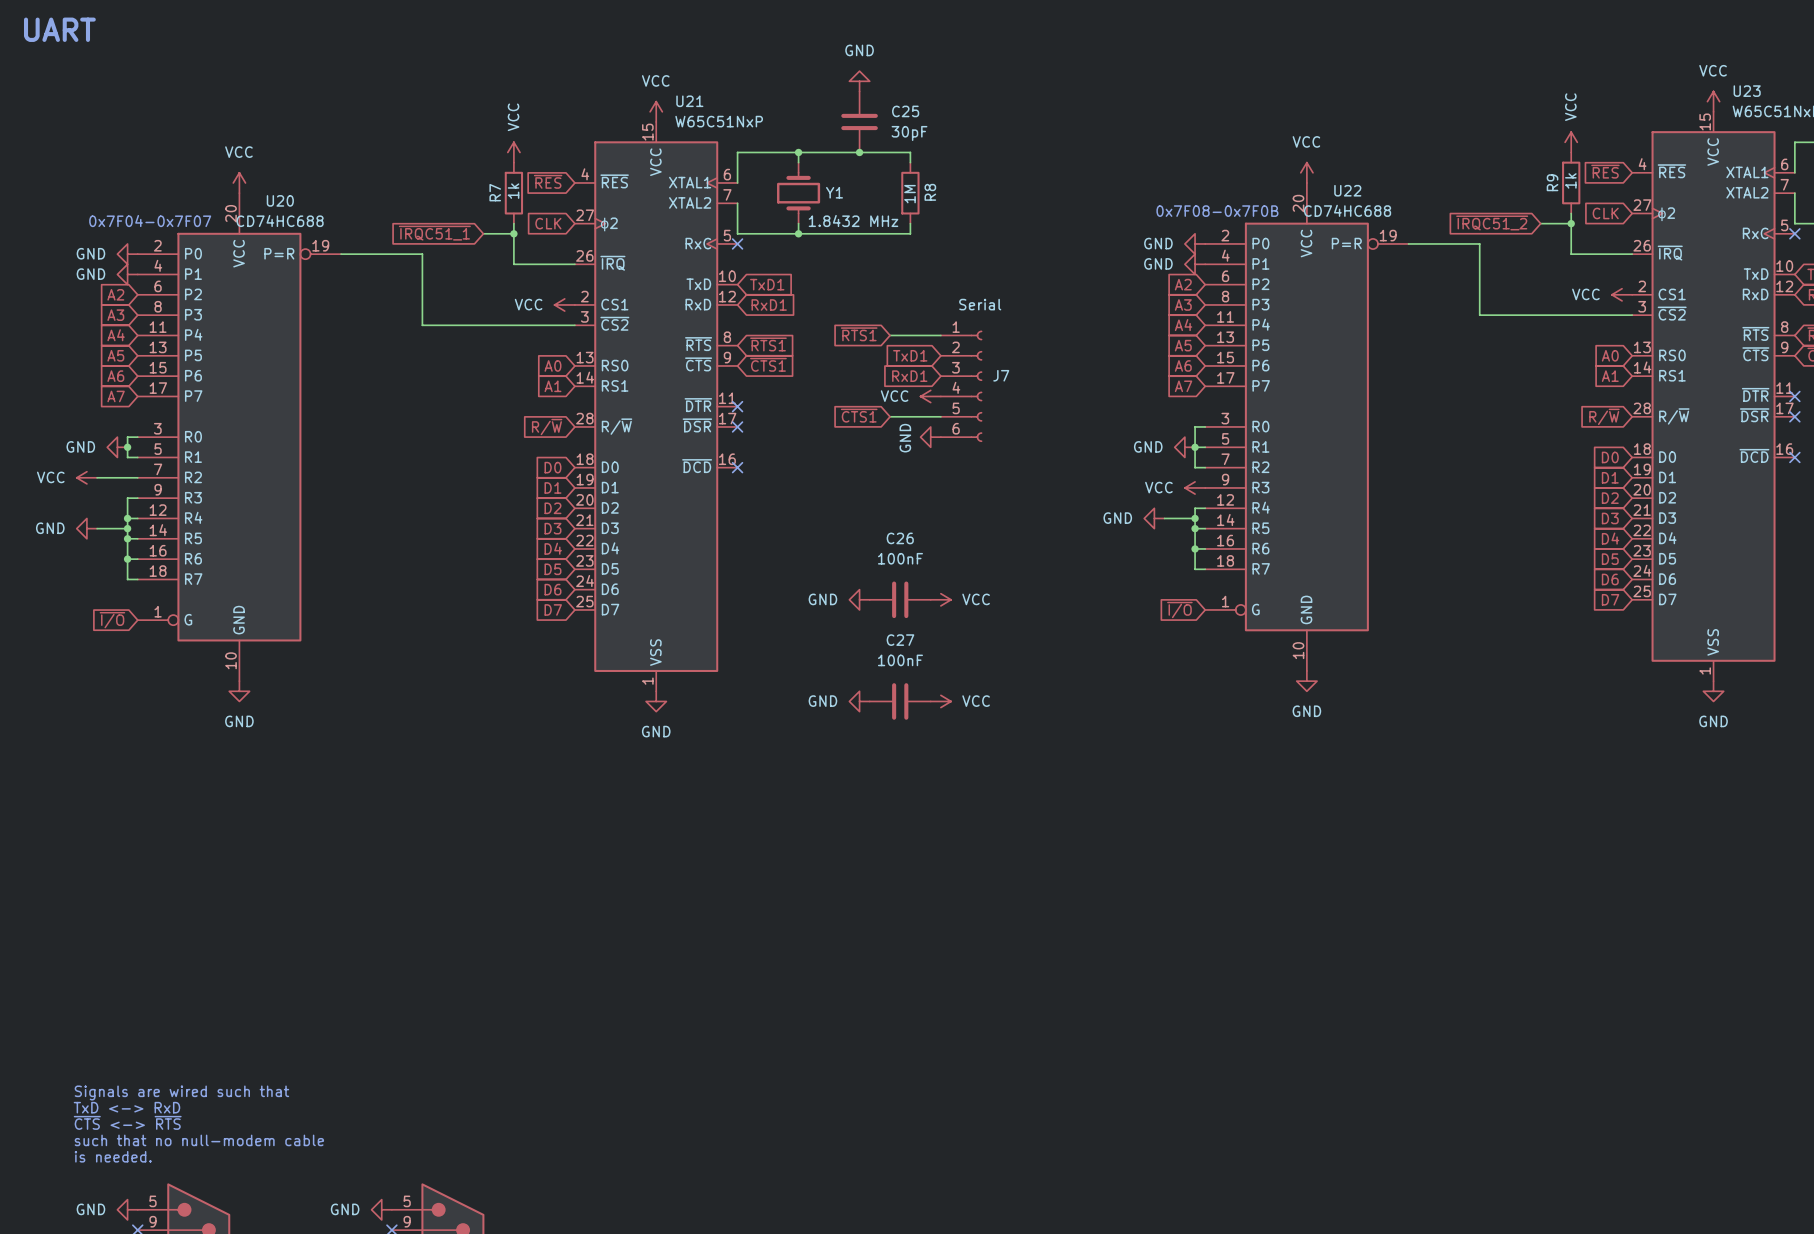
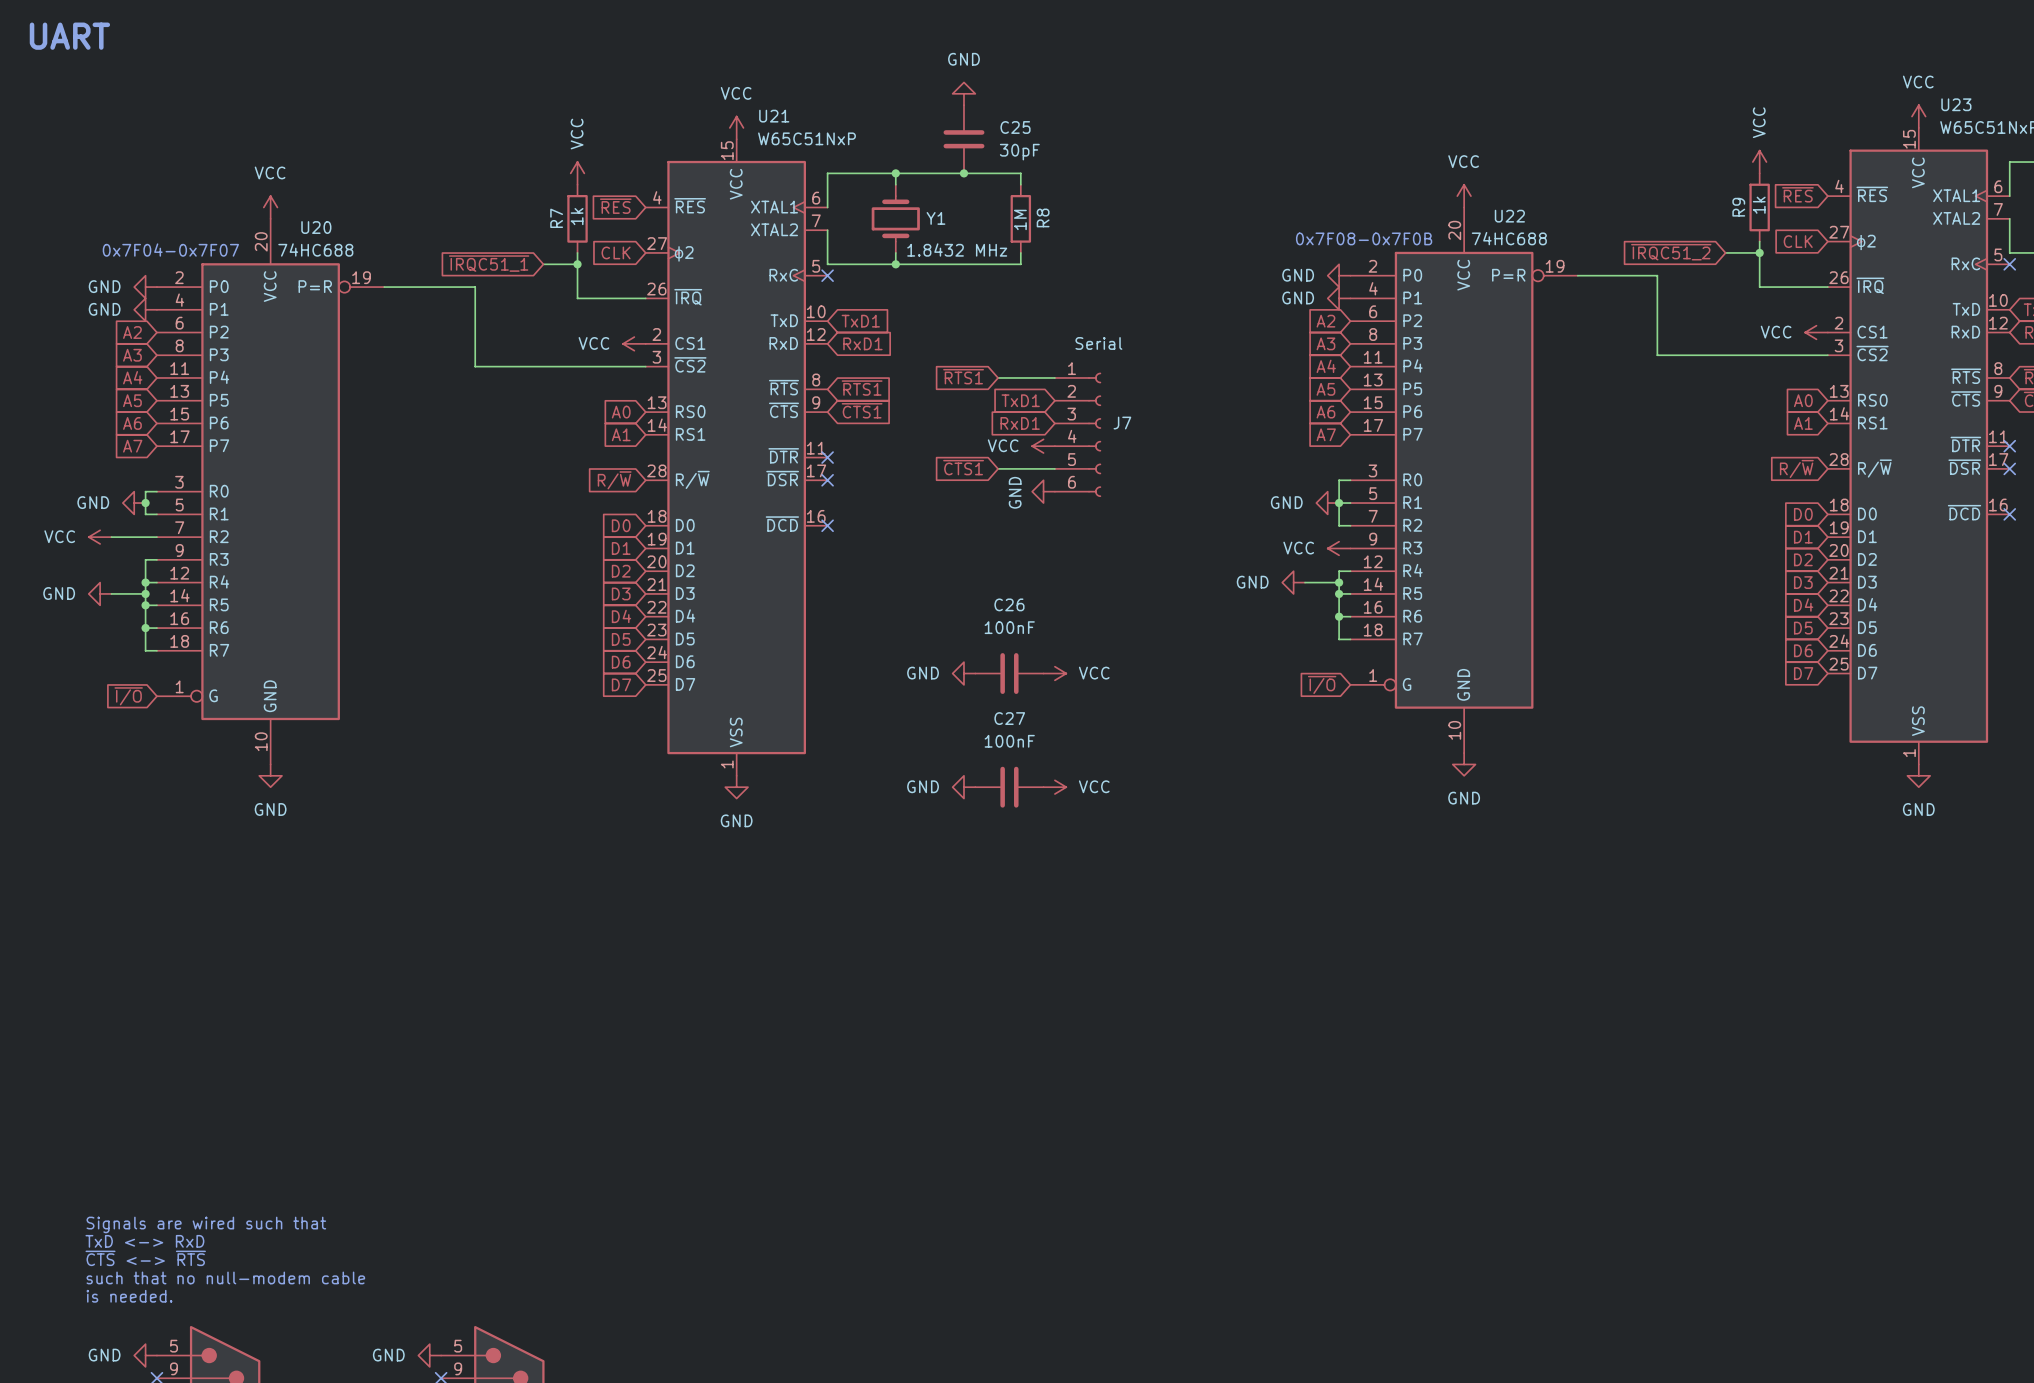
U22 value: CD74HC688 (1347, 210) -> 74HC688 (1509, 238)
U20 value: CD74HC688 (280, 220) -> 74HC688 (315, 249)

